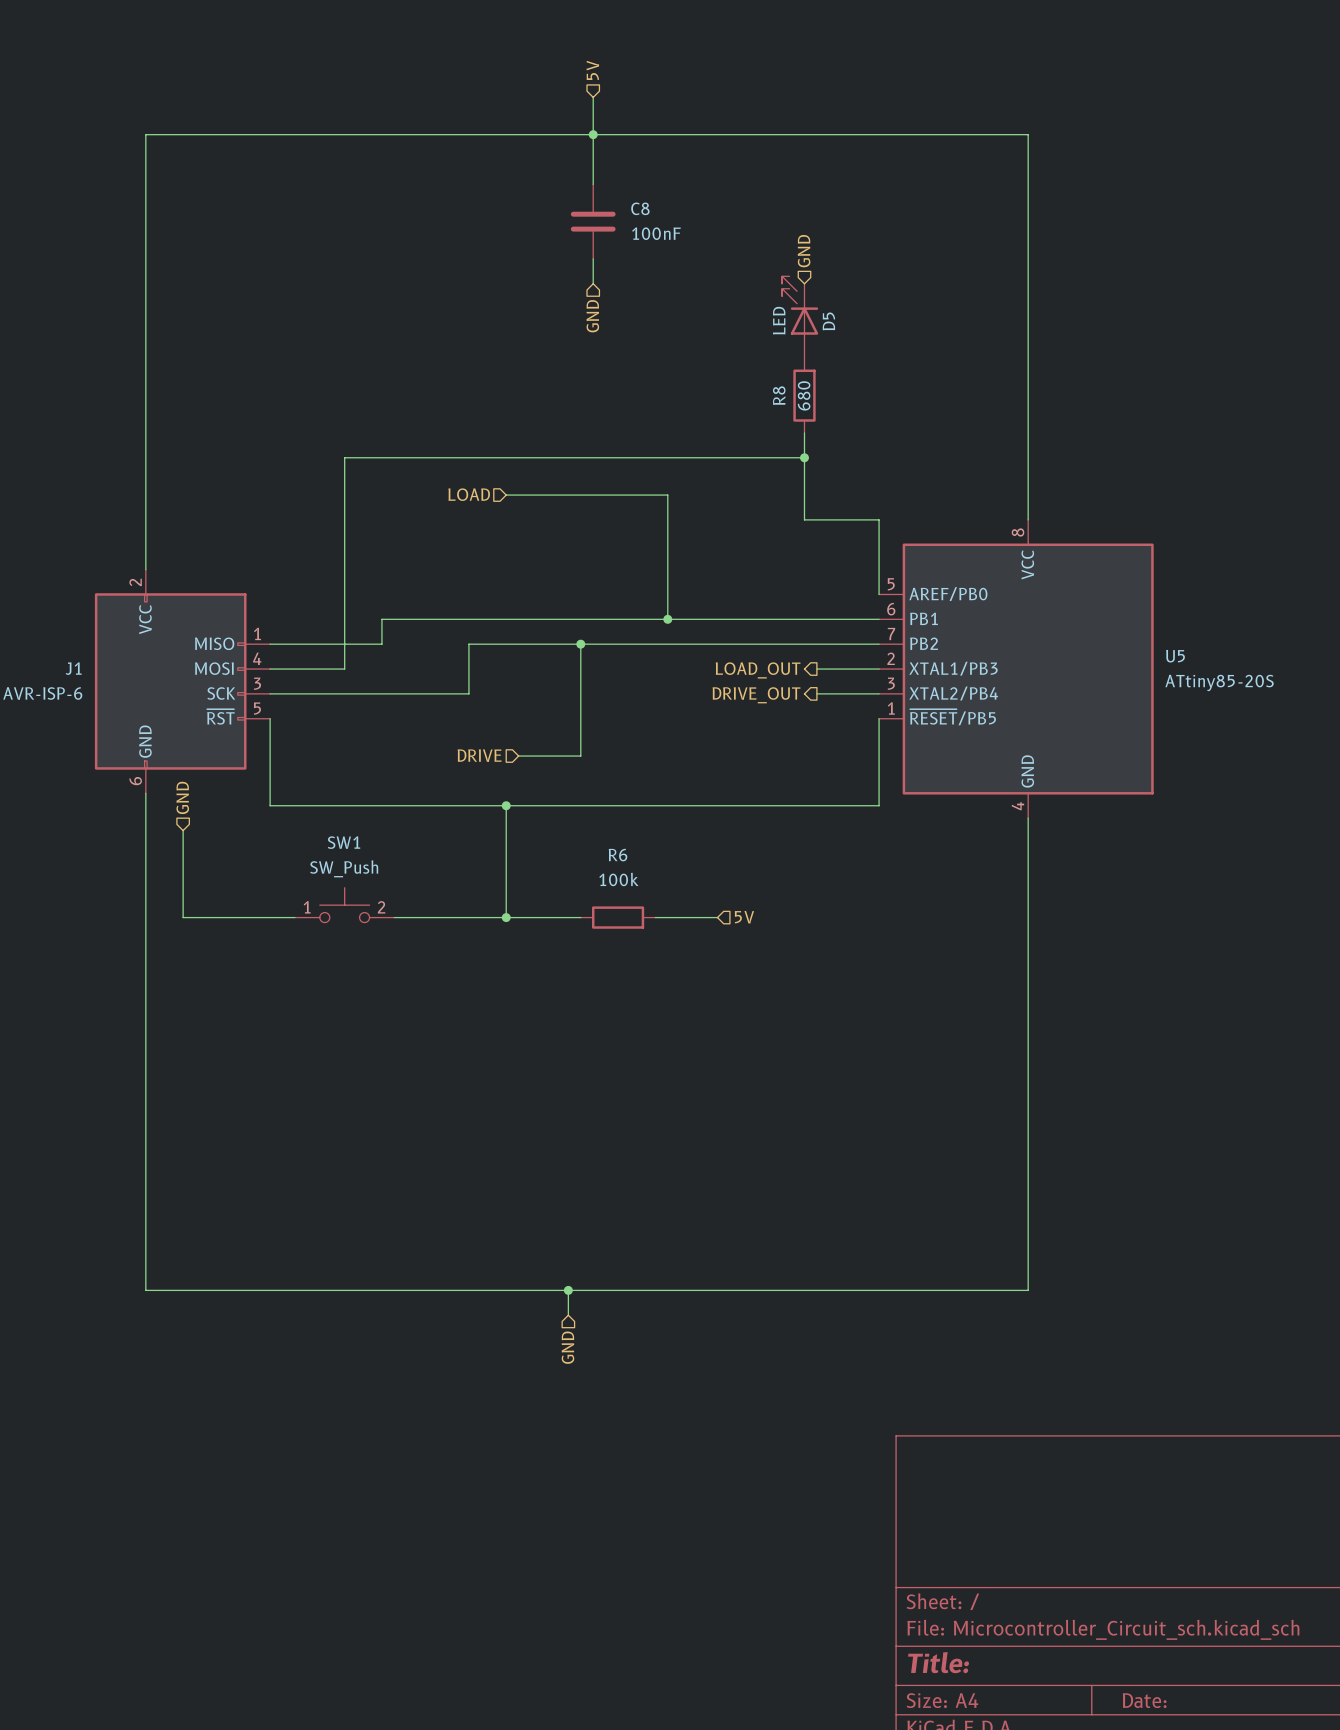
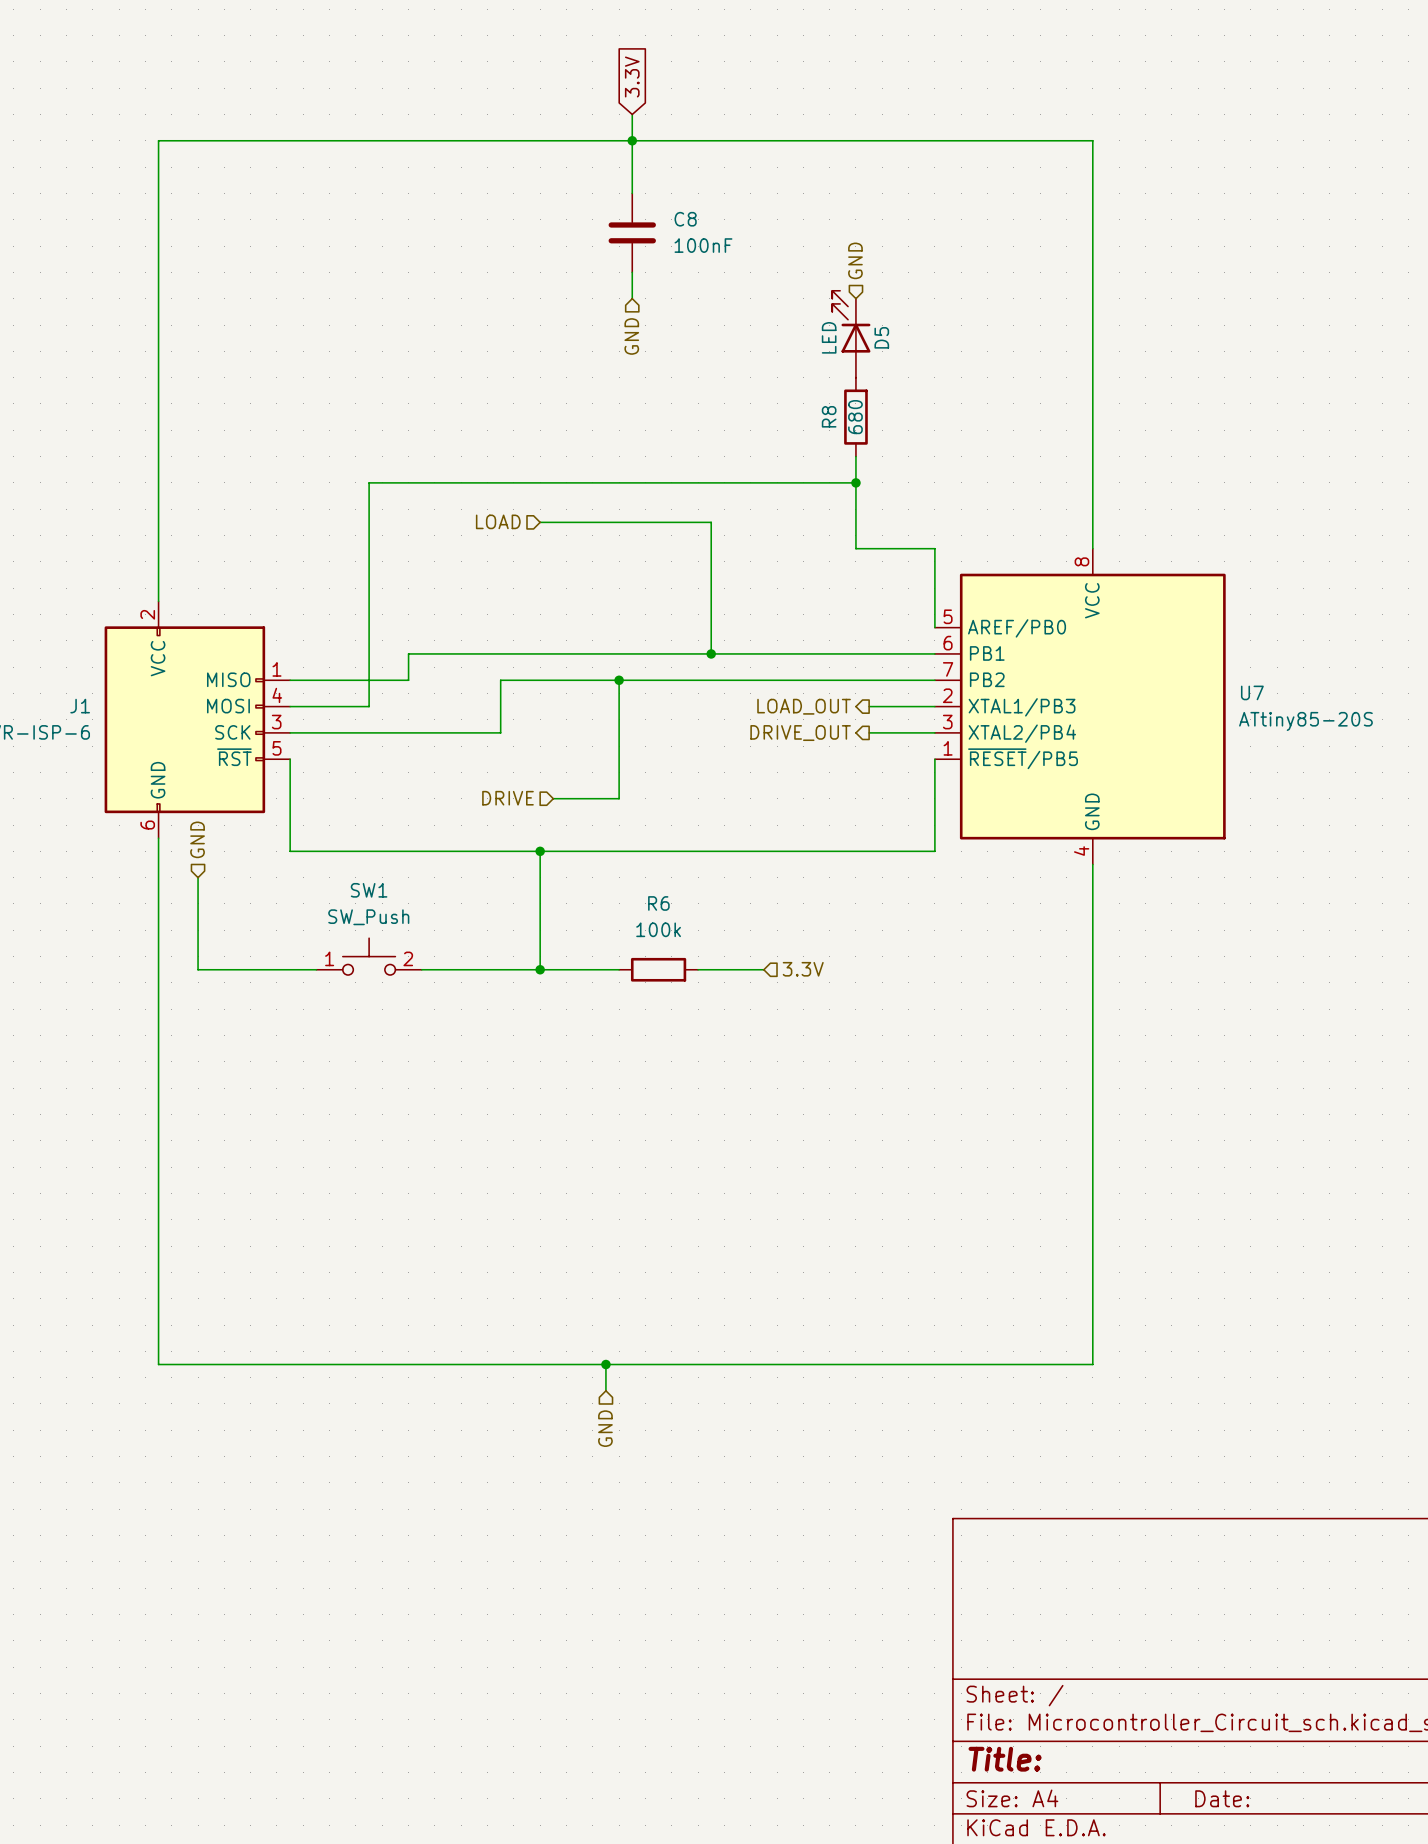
hierarchical label: 5V (592, 70) -> none
global label: none -> 3.3V (632, 77)
wire: (593, 97) (593, 109) -> none
U5 name: U5 (1175, 656) -> U7 (1252, 692)
hierarchical label: 5V (744, 917) -> 3.3V (803, 969)

